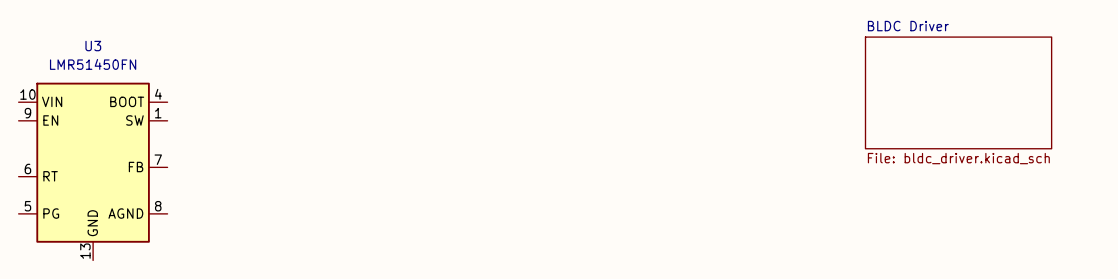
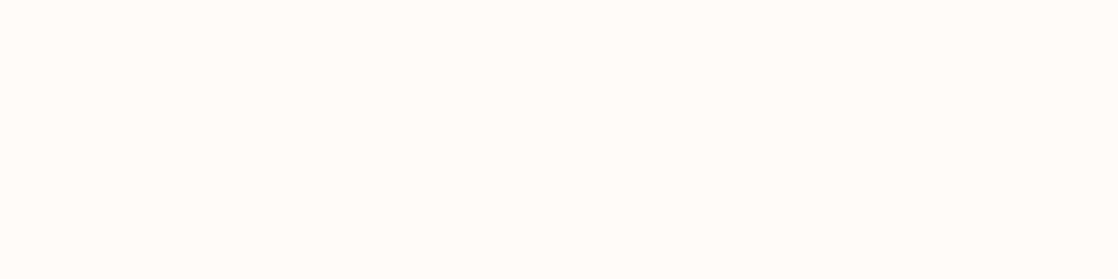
sheet BLDC Driver: File: bldc_driver.kicad_sch (958, 92) -> none
U3: LMR51450FN (93, 171) -> none

